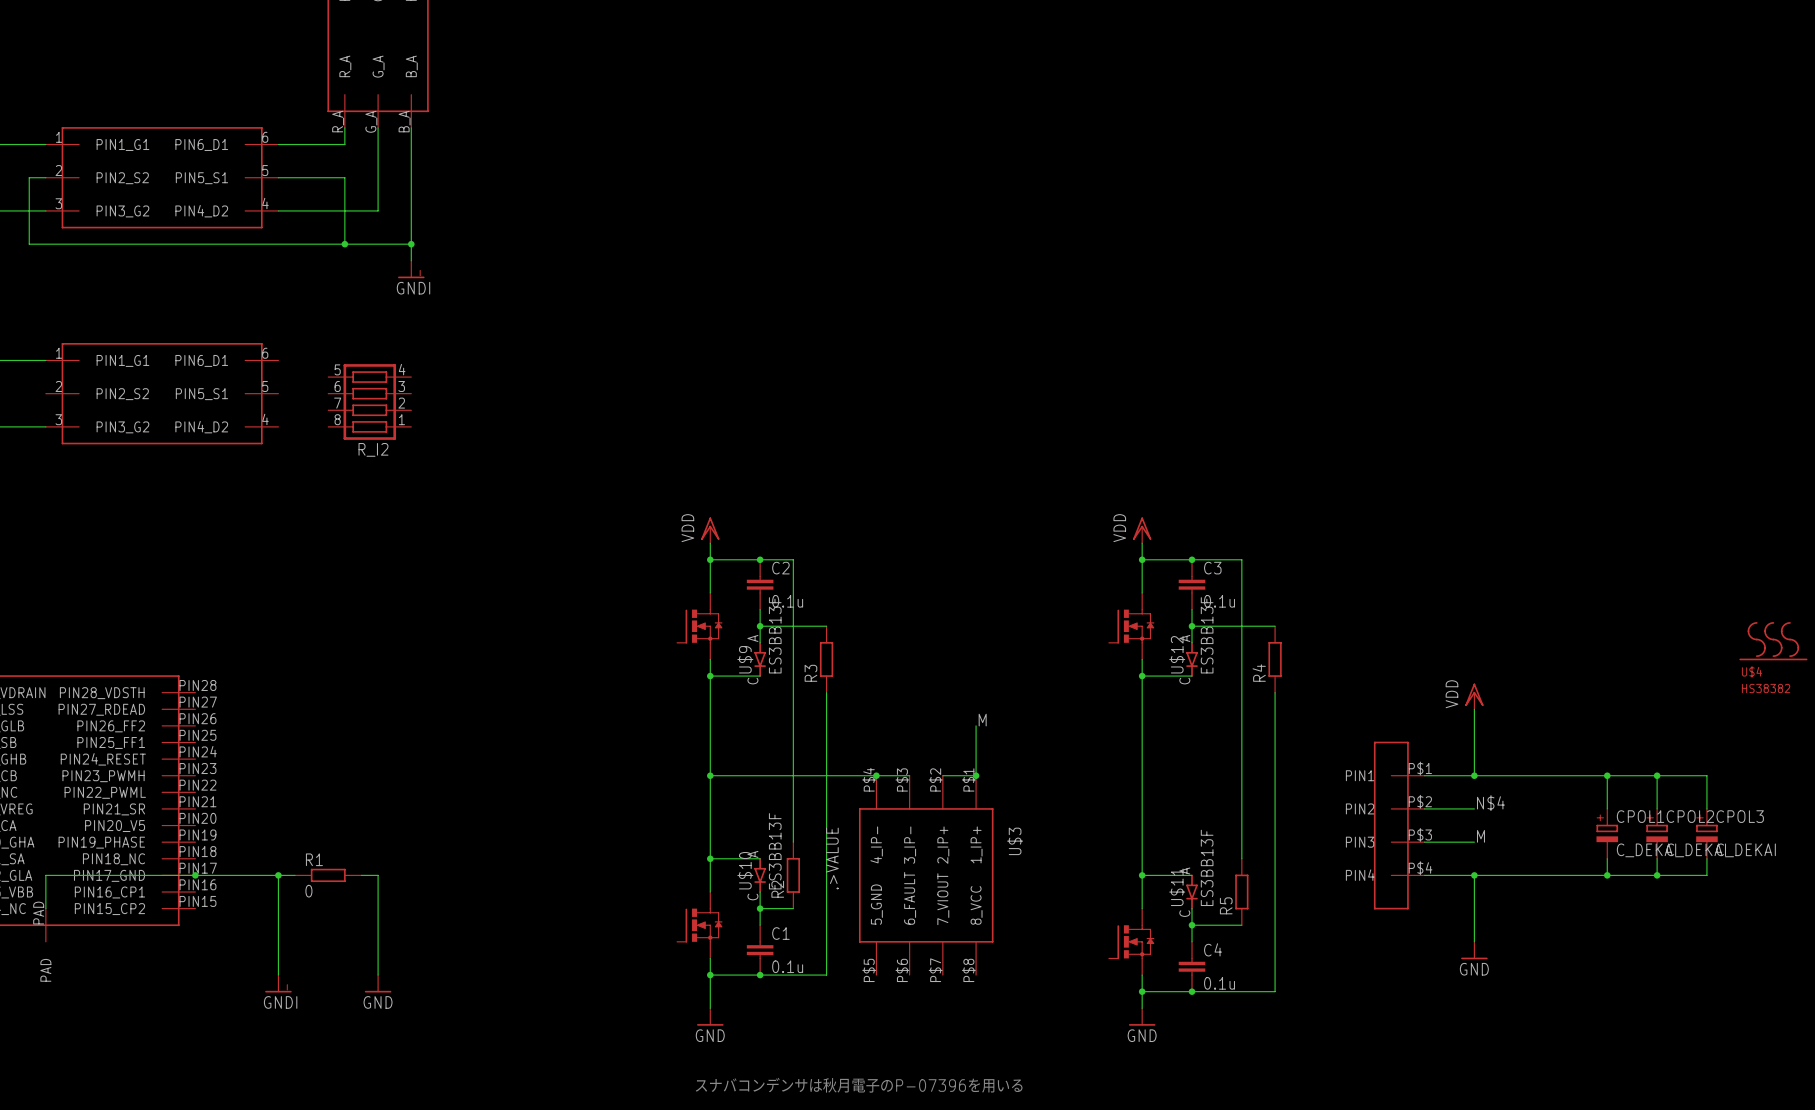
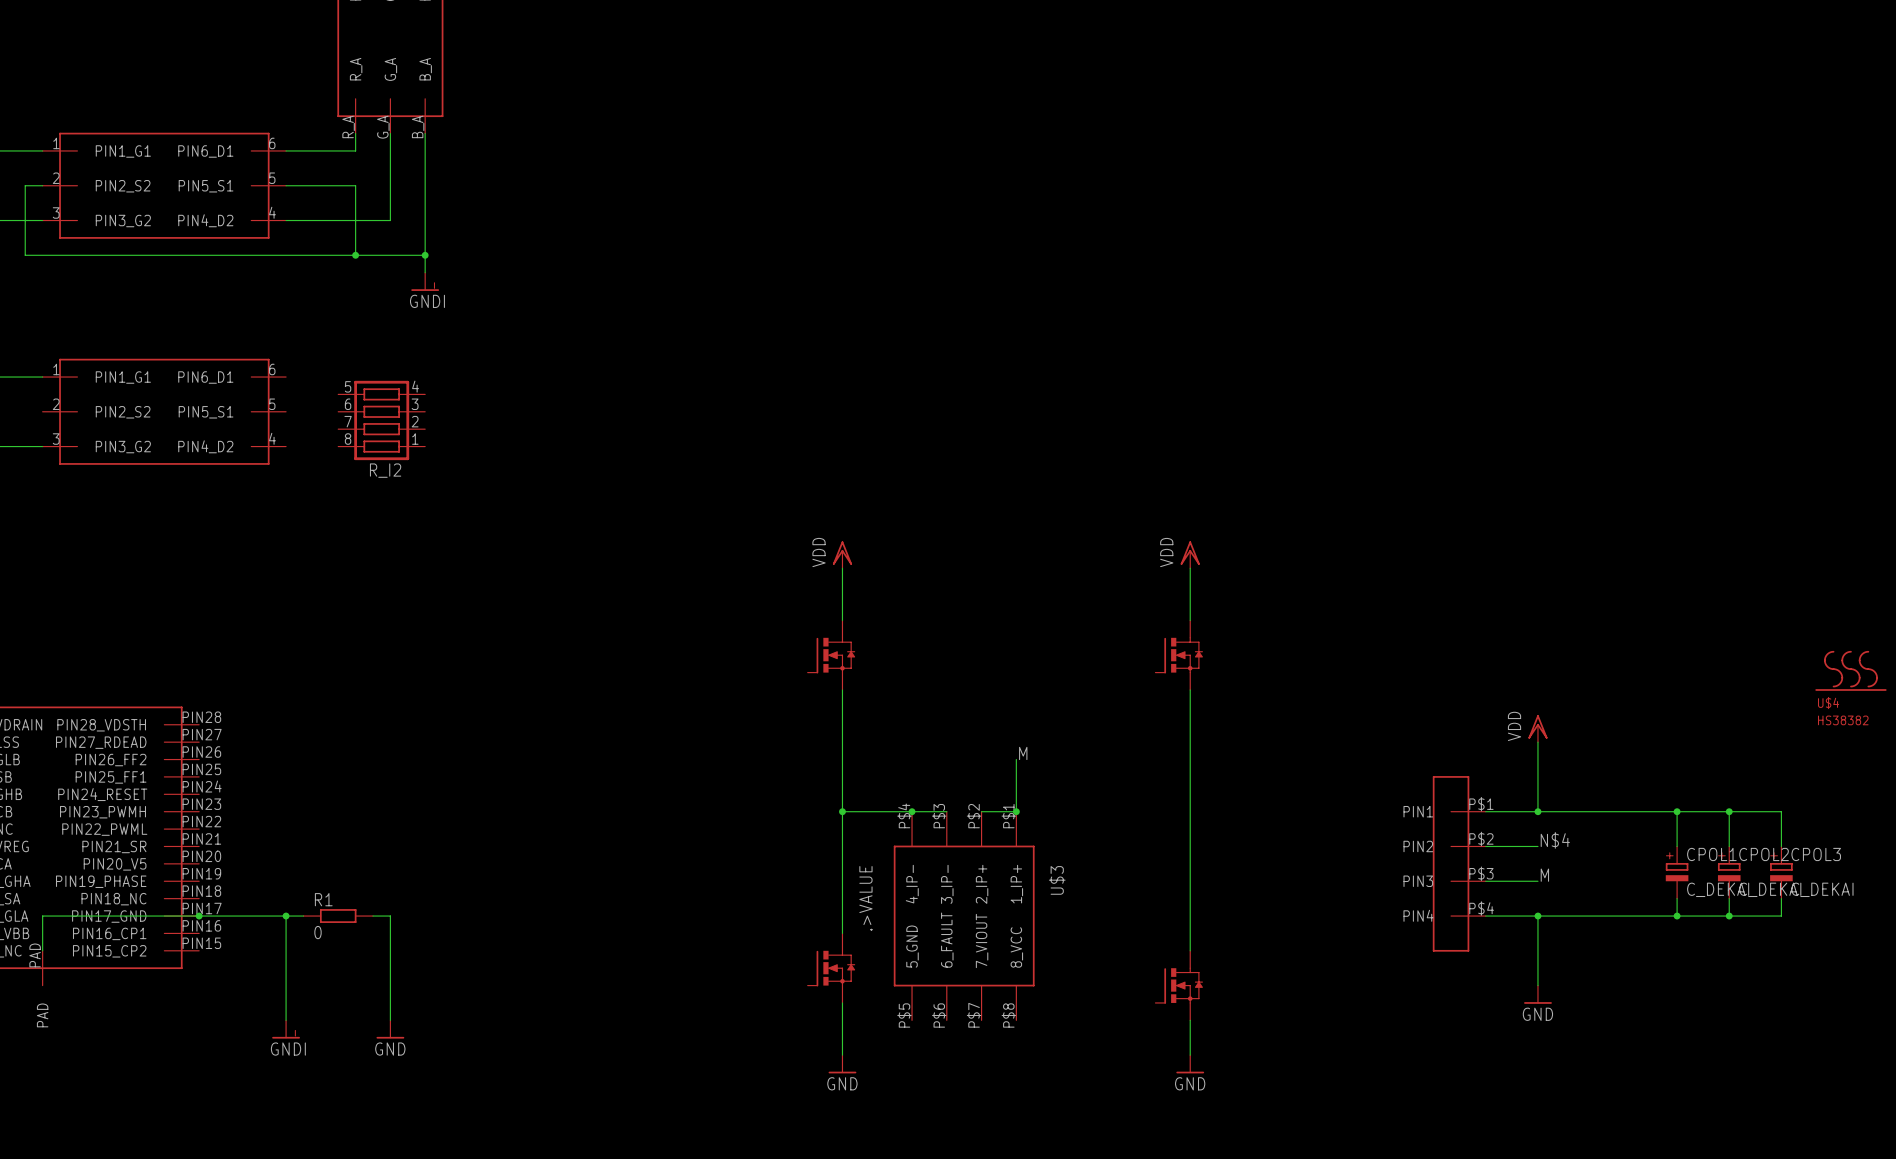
power symbol position: VDD (710, 530) -> VDD (842, 554)
wire: (710, 543) (710, 593) -> (842, 568) (842, 620)
wire: (710, 559) (793, 559) (793, 842) -> none
junction: (710, 559) -> none
junction: (760, 559) -> none
wire: (1142, 559) (1241, 559) (1241, 858) -> none
junction: (1142, 559) -> none
junction: (1192, 559) -> none
C2: 0.1u (760, 584) -> none
C3: 0.1u (1192, 584) -> none
wire: (760, 609) (760, 642) -> none
wire: (1192, 609) (1192, 642) -> none
part position: (699, 626) -> (831, 655)
wire: (760, 626) (826, 626) -> none
junction: (760, 626) -> none
wire: (1192, 626) (1275, 626) -> none
junction: (1192, 626) -> none
wire: (710, 659) (710, 892) -> (842, 689) (842, 933)
U$9: ES3BB13F (760, 659) -> none
R3: (826, 659) -> none
U$12: ES3BB13F (1192, 659) -> none
R4: (1275, 659) -> none
wire: (710, 676) (760, 676) -> none
junction: (710, 676) -> none
wire: (1142, 676) (1192, 676) -> none
junction: (1142, 676) -> none
wire: (826, 692) (826, 975) (710, 975) -> none
wire: (1275, 692) (1275, 991) (1142, 991) -> none
wire: (710, 775) (809, 775) -> none
junction: (710, 775) -> none
junction: none -> (842, 811)
wire: (710, 858) (760, 858) -> none
junction: (710, 858) -> none
U$10: ES3BB13F (760, 875) -> none
R2: (793, 875) -> none
wire: (1142, 875) (1192, 875) -> none
junction: (1142, 875) -> none
wire: (760, 892) (760, 925) -> none
U$11: ES3BB13F (1192, 892) -> none
R5: (1241, 892) -> none
wire: (760, 908) (793, 908) -> none
junction: (760, 908) -> none
wire: (1192, 908) (1192, 941) -> none
part position: (699, 925) -> (831, 968)
wire: (1192, 925) (1241, 925) -> none
junction: (1192, 925) -> none
C1: 0.1u (760, 950) -> none
wire: (710, 958) (710, 1008) -> (842, 1002) (842, 1055)
C4: 0.1u (1192, 966) -> none
junction: (710, 975) -> none
junction: (760, 975) -> none
junction: (1142, 991) -> none
junction: (1192, 991) -> none
power symbol position: GND (710, 1017) -> GND (842, 1064)
text: スナバコンデンサは秋月電子のP-07396を用いる (859, 1085) -> none

